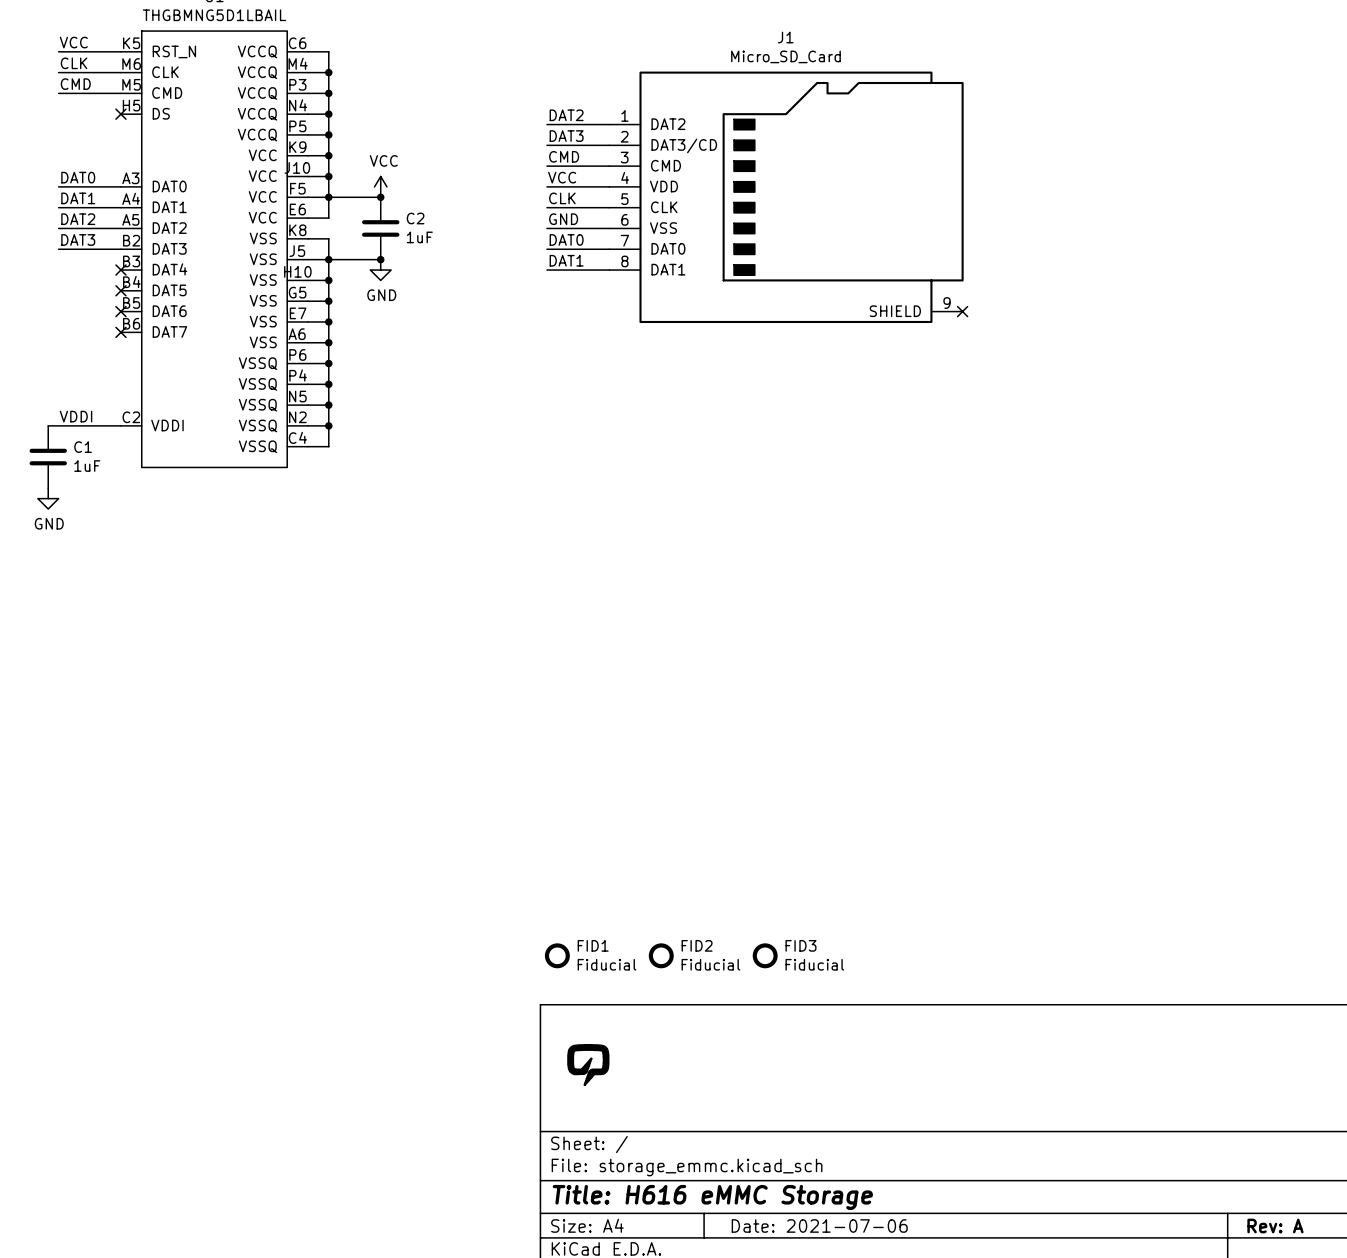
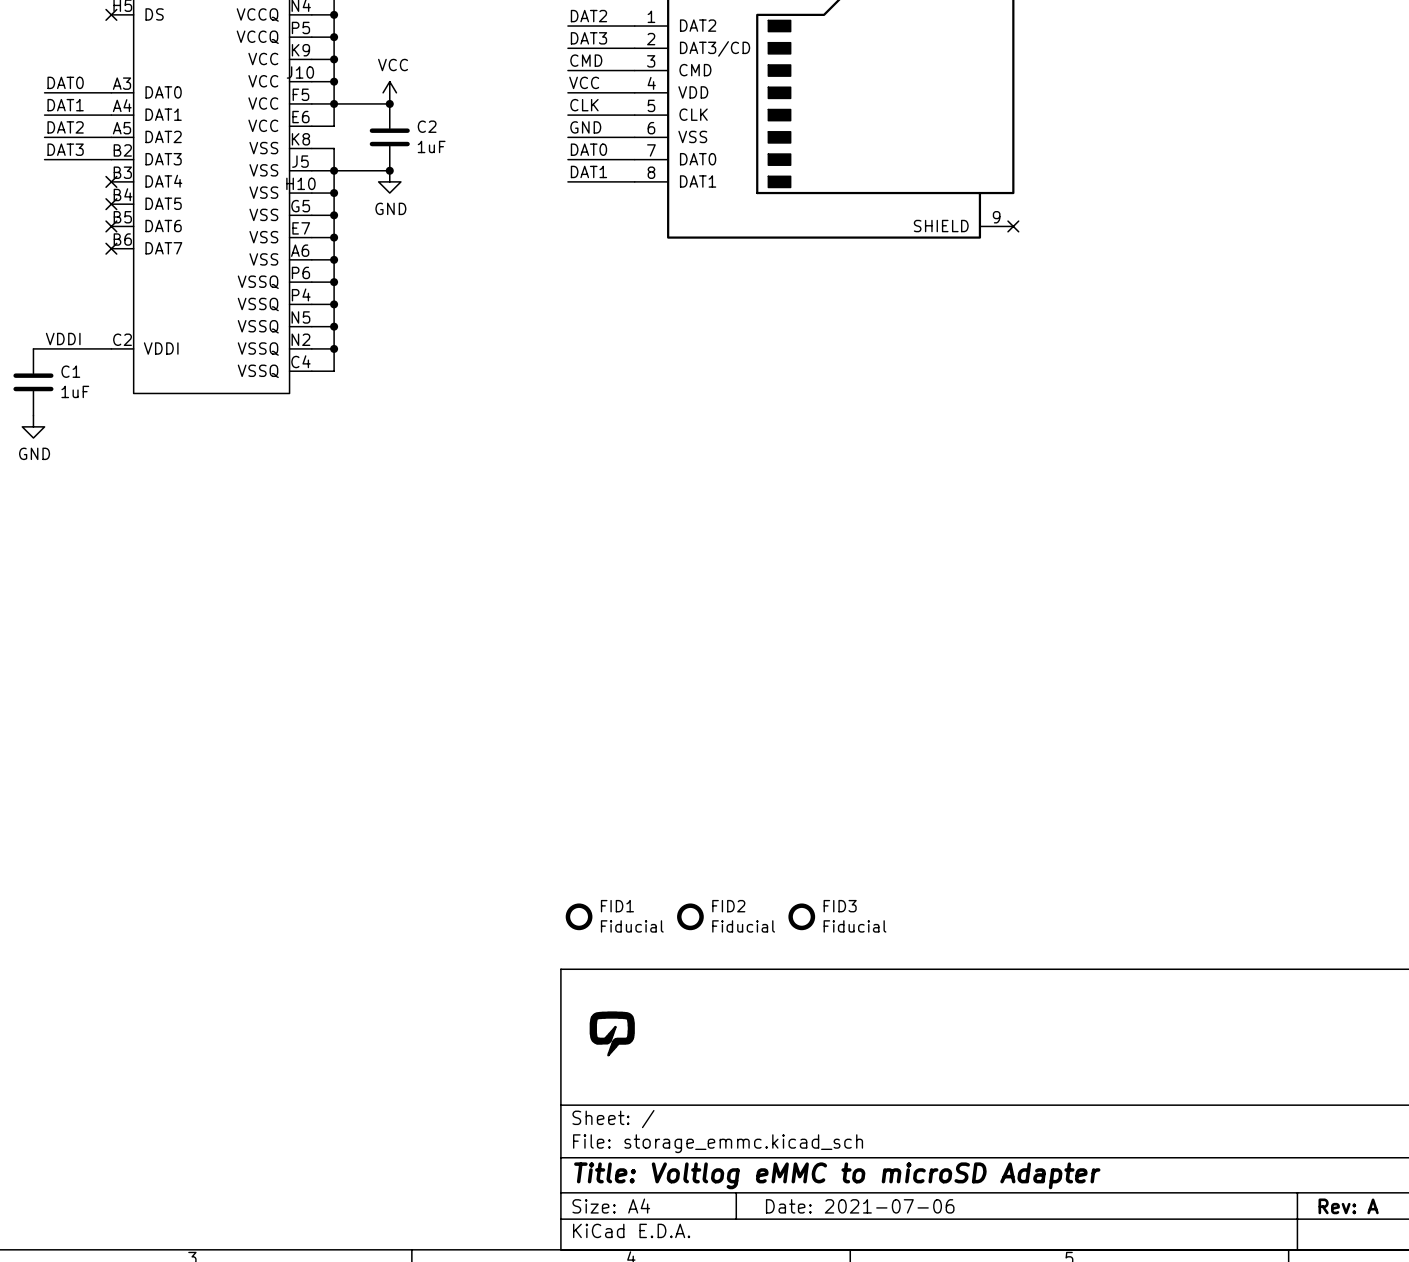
title block: Title: H616 eMMC Storage (712, 1197) -> Title: Voltlog eMMC to microSD Adapter (837, 1175)

